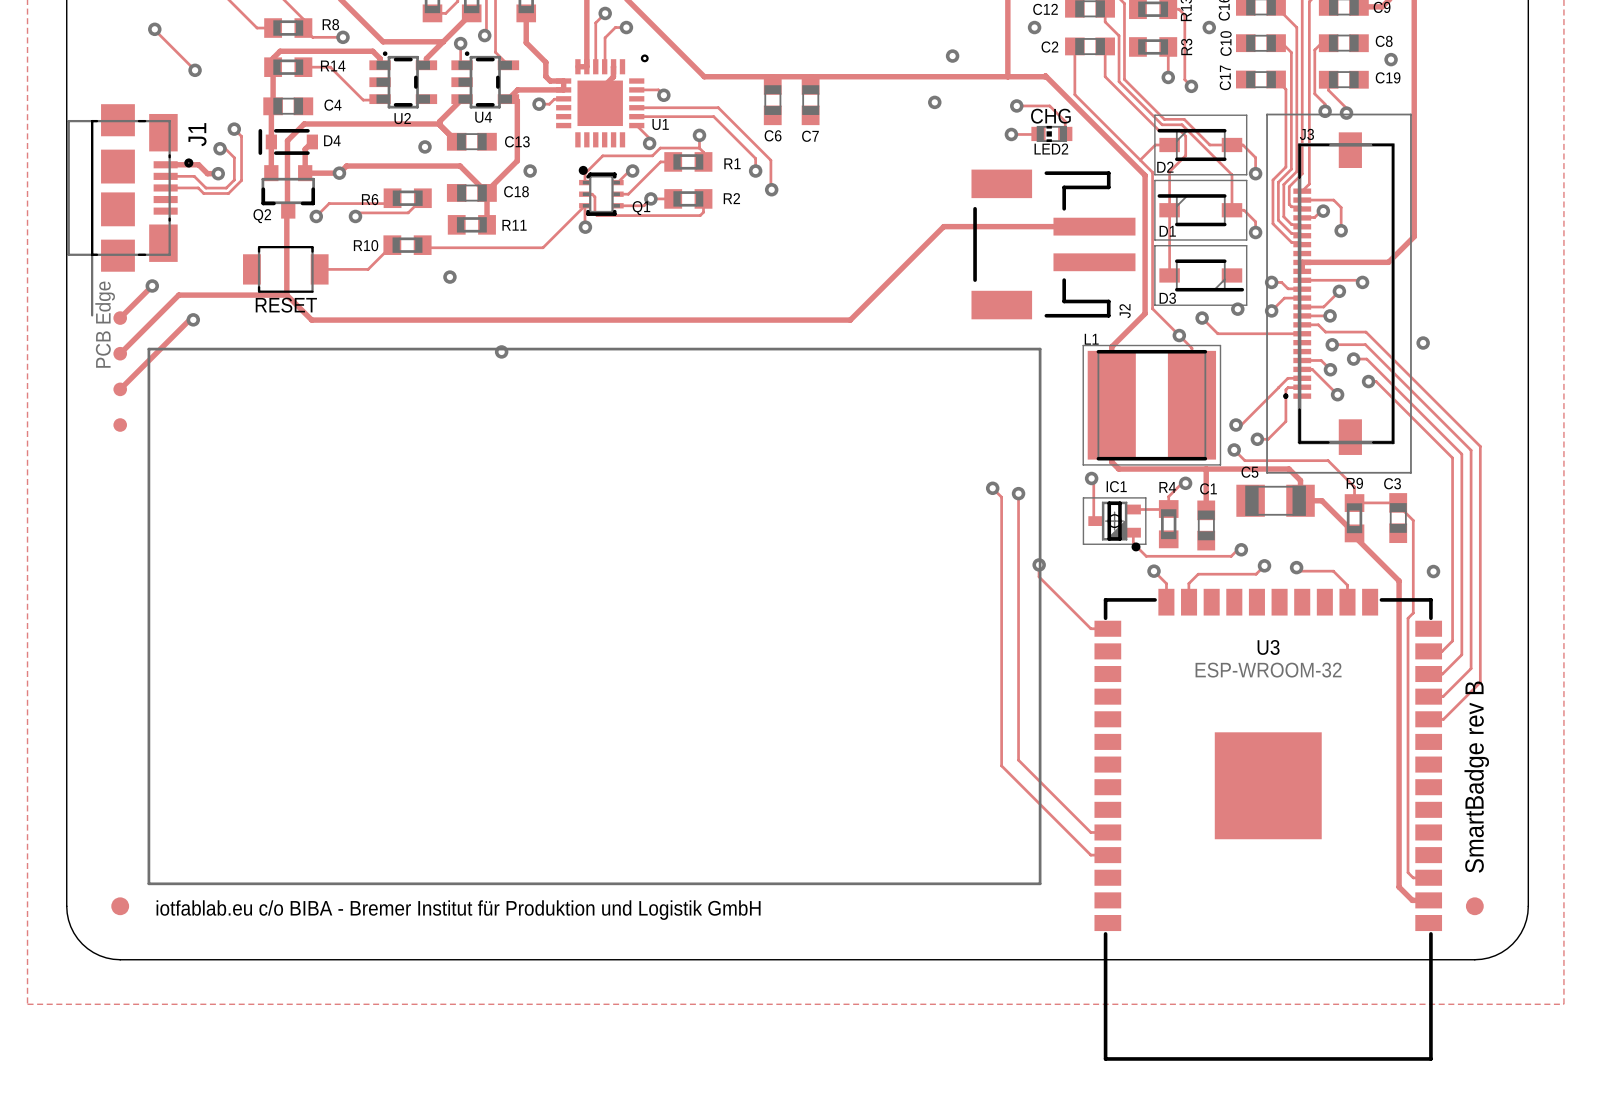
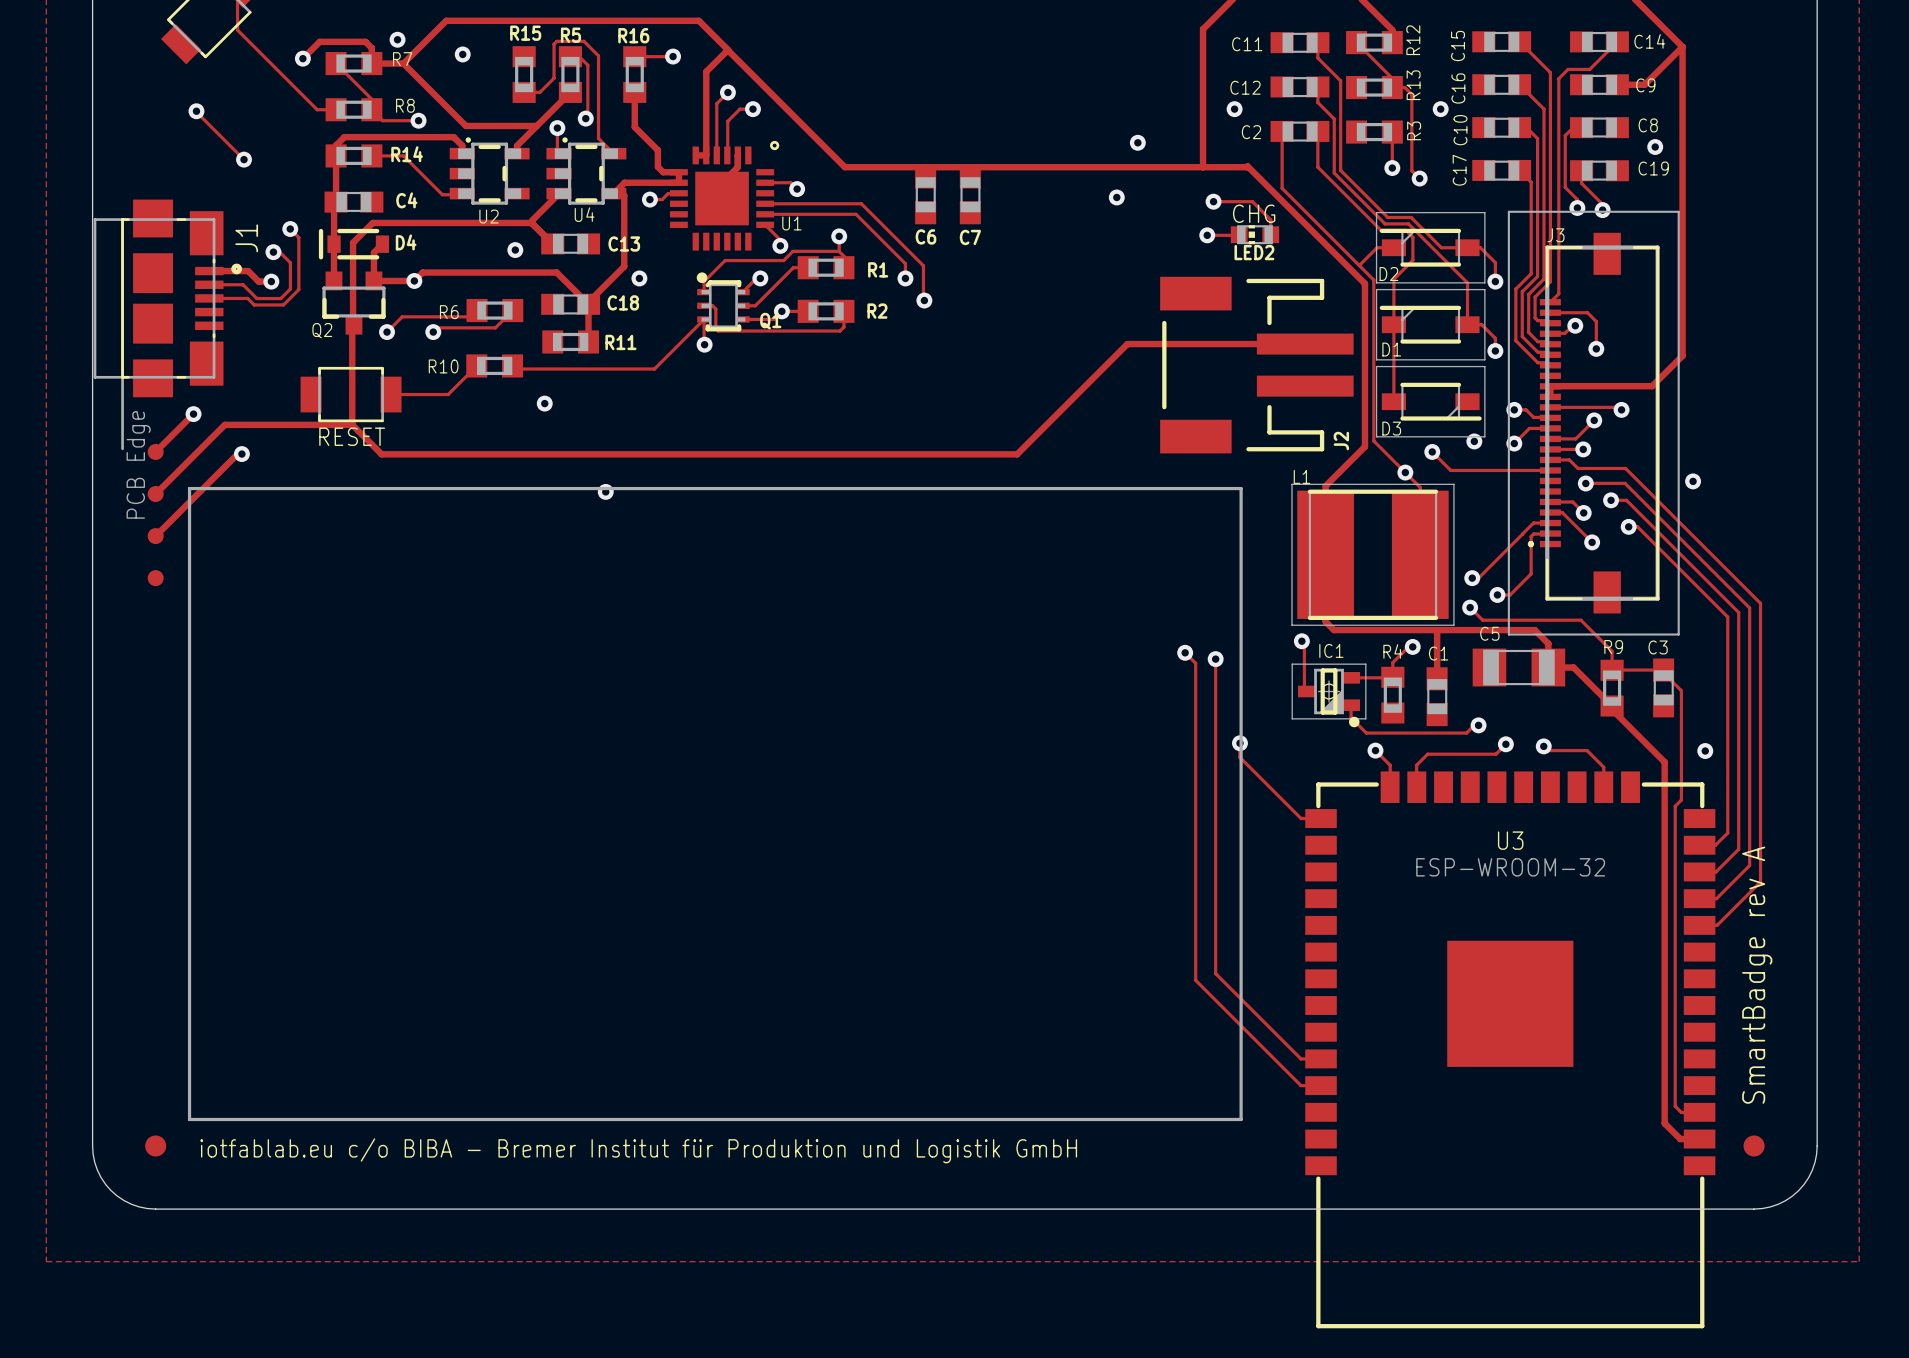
text: SmartBadge rev B (1476, 777) -> SmartBadge rev A (1757, 975)

